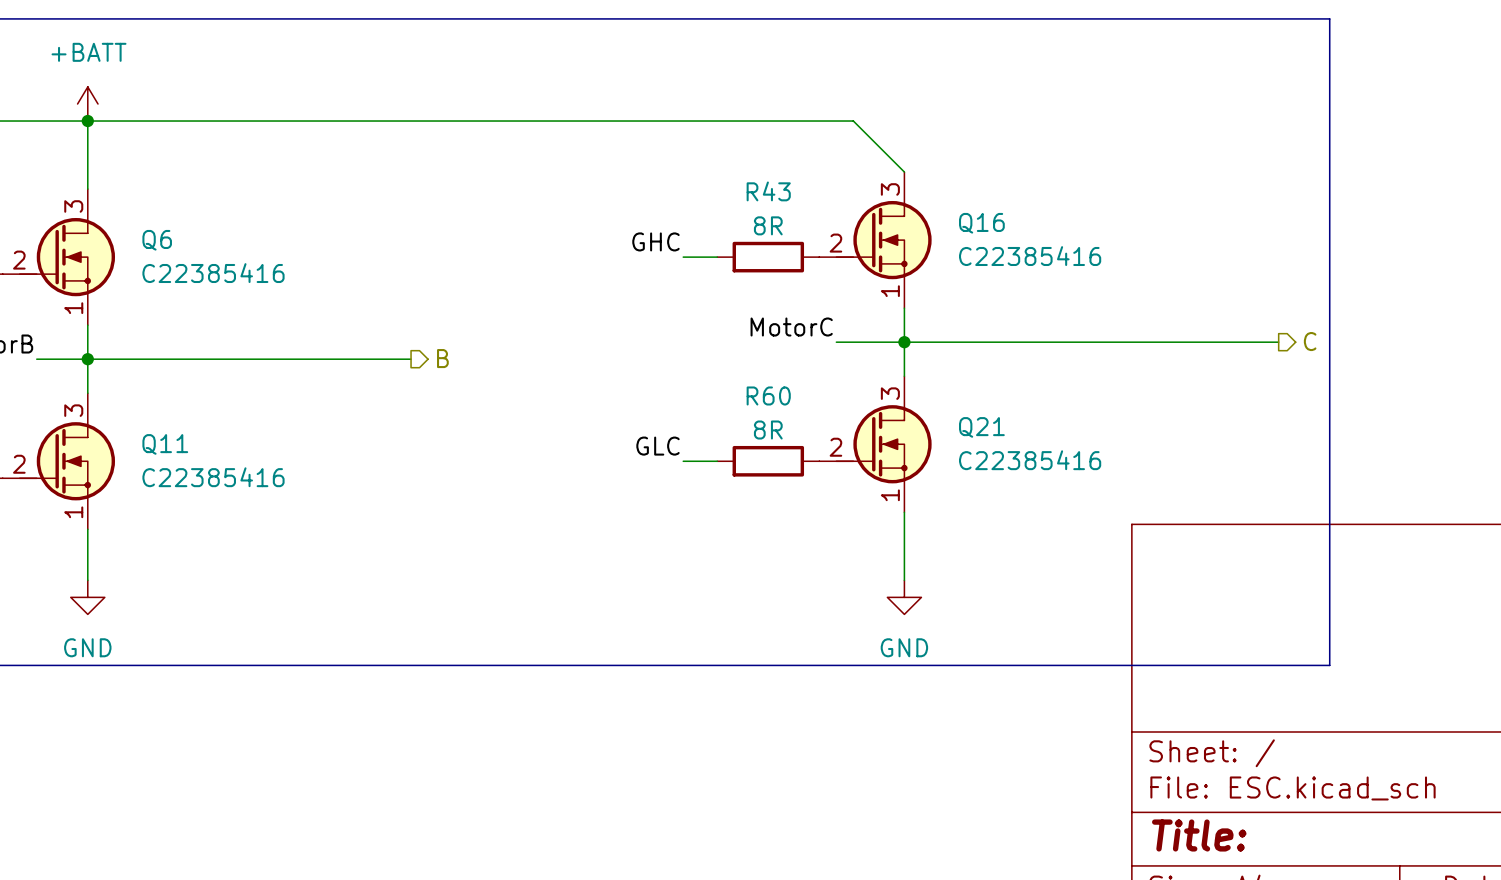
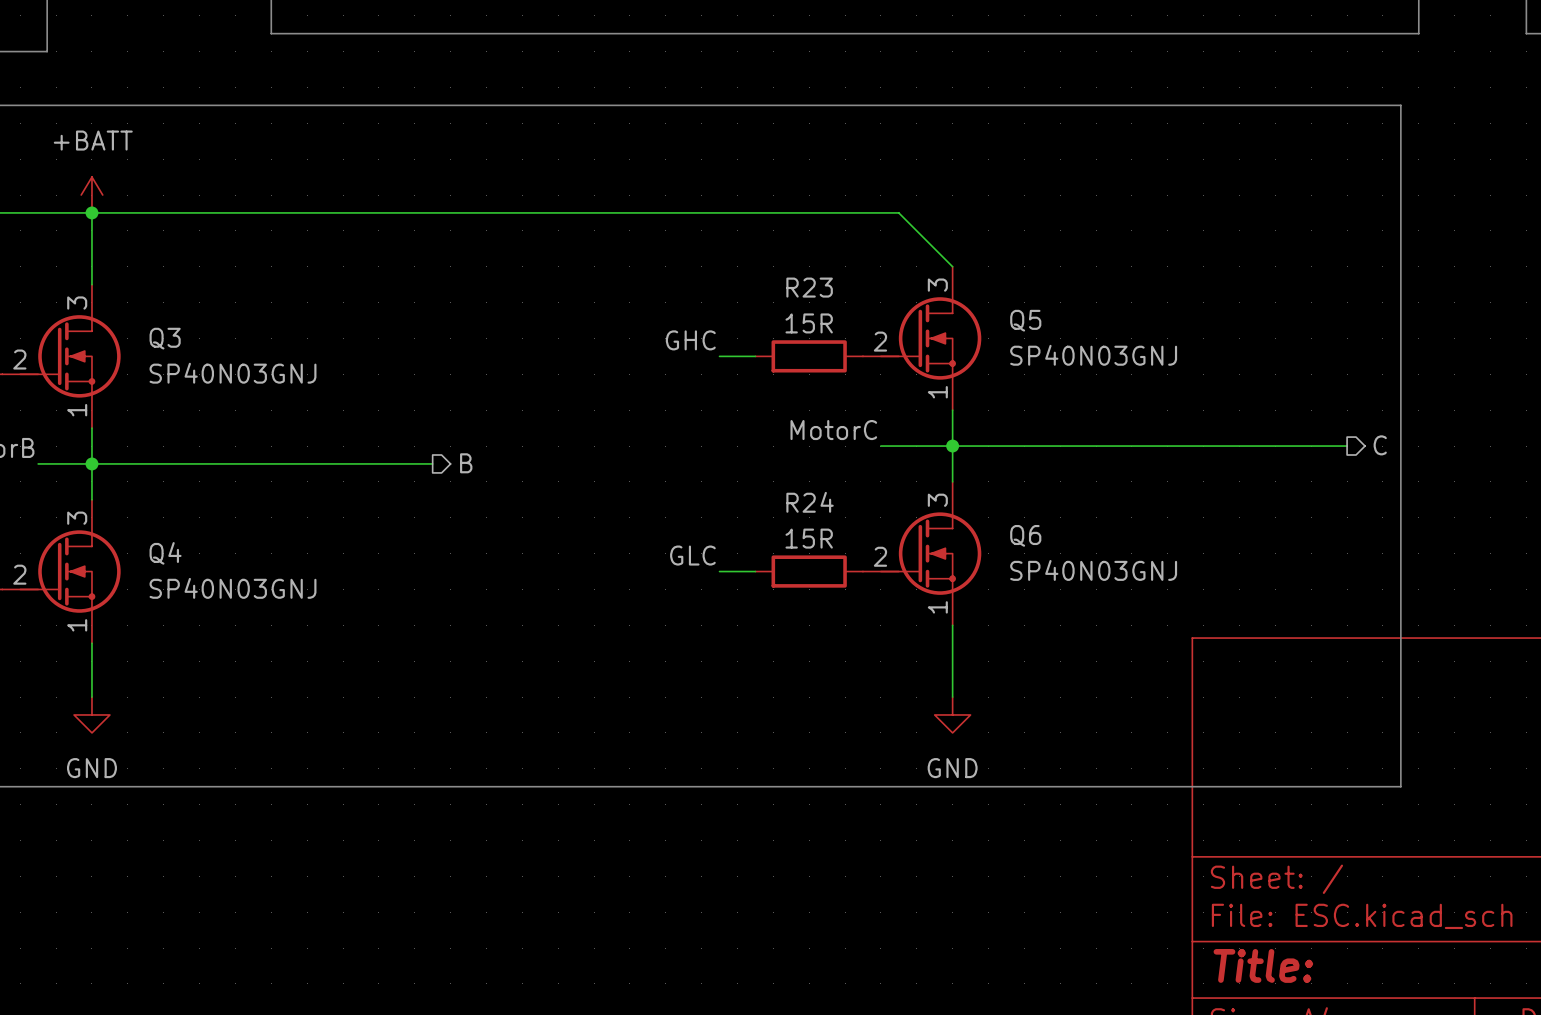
R43 name: R43 (768, 191) -> R23 (809, 287)
Q16 name: Q16 (981, 223) -> Q5 (1025, 320)
R43 value: 8R (768, 225) -> 15R (809, 323)
Q6 name: Q6 (157, 240) -> Q3 (165, 338)
Q16 value: C22385416 (1030, 256) -> SP40N03GNJ (1093, 355)
Q6 value: C22385416 (213, 273) -> SP40N03GNJ (232, 373)
R60 name: R60 (768, 395) -> R24 (810, 502)
Q21 name: Q21 (981, 427) -> Q6 (1025, 535)
R60 value: 8R (768, 430) -> 15R (809, 538)
Q11 name: Q11 (165, 444) -> Q4 (165, 553)
Q21 value: C22385416 (1030, 460) -> SP40N03GNJ (1093, 570)
Q11 value: C22385416 (213, 477) -> SP40N03GNJ (232, 588)

